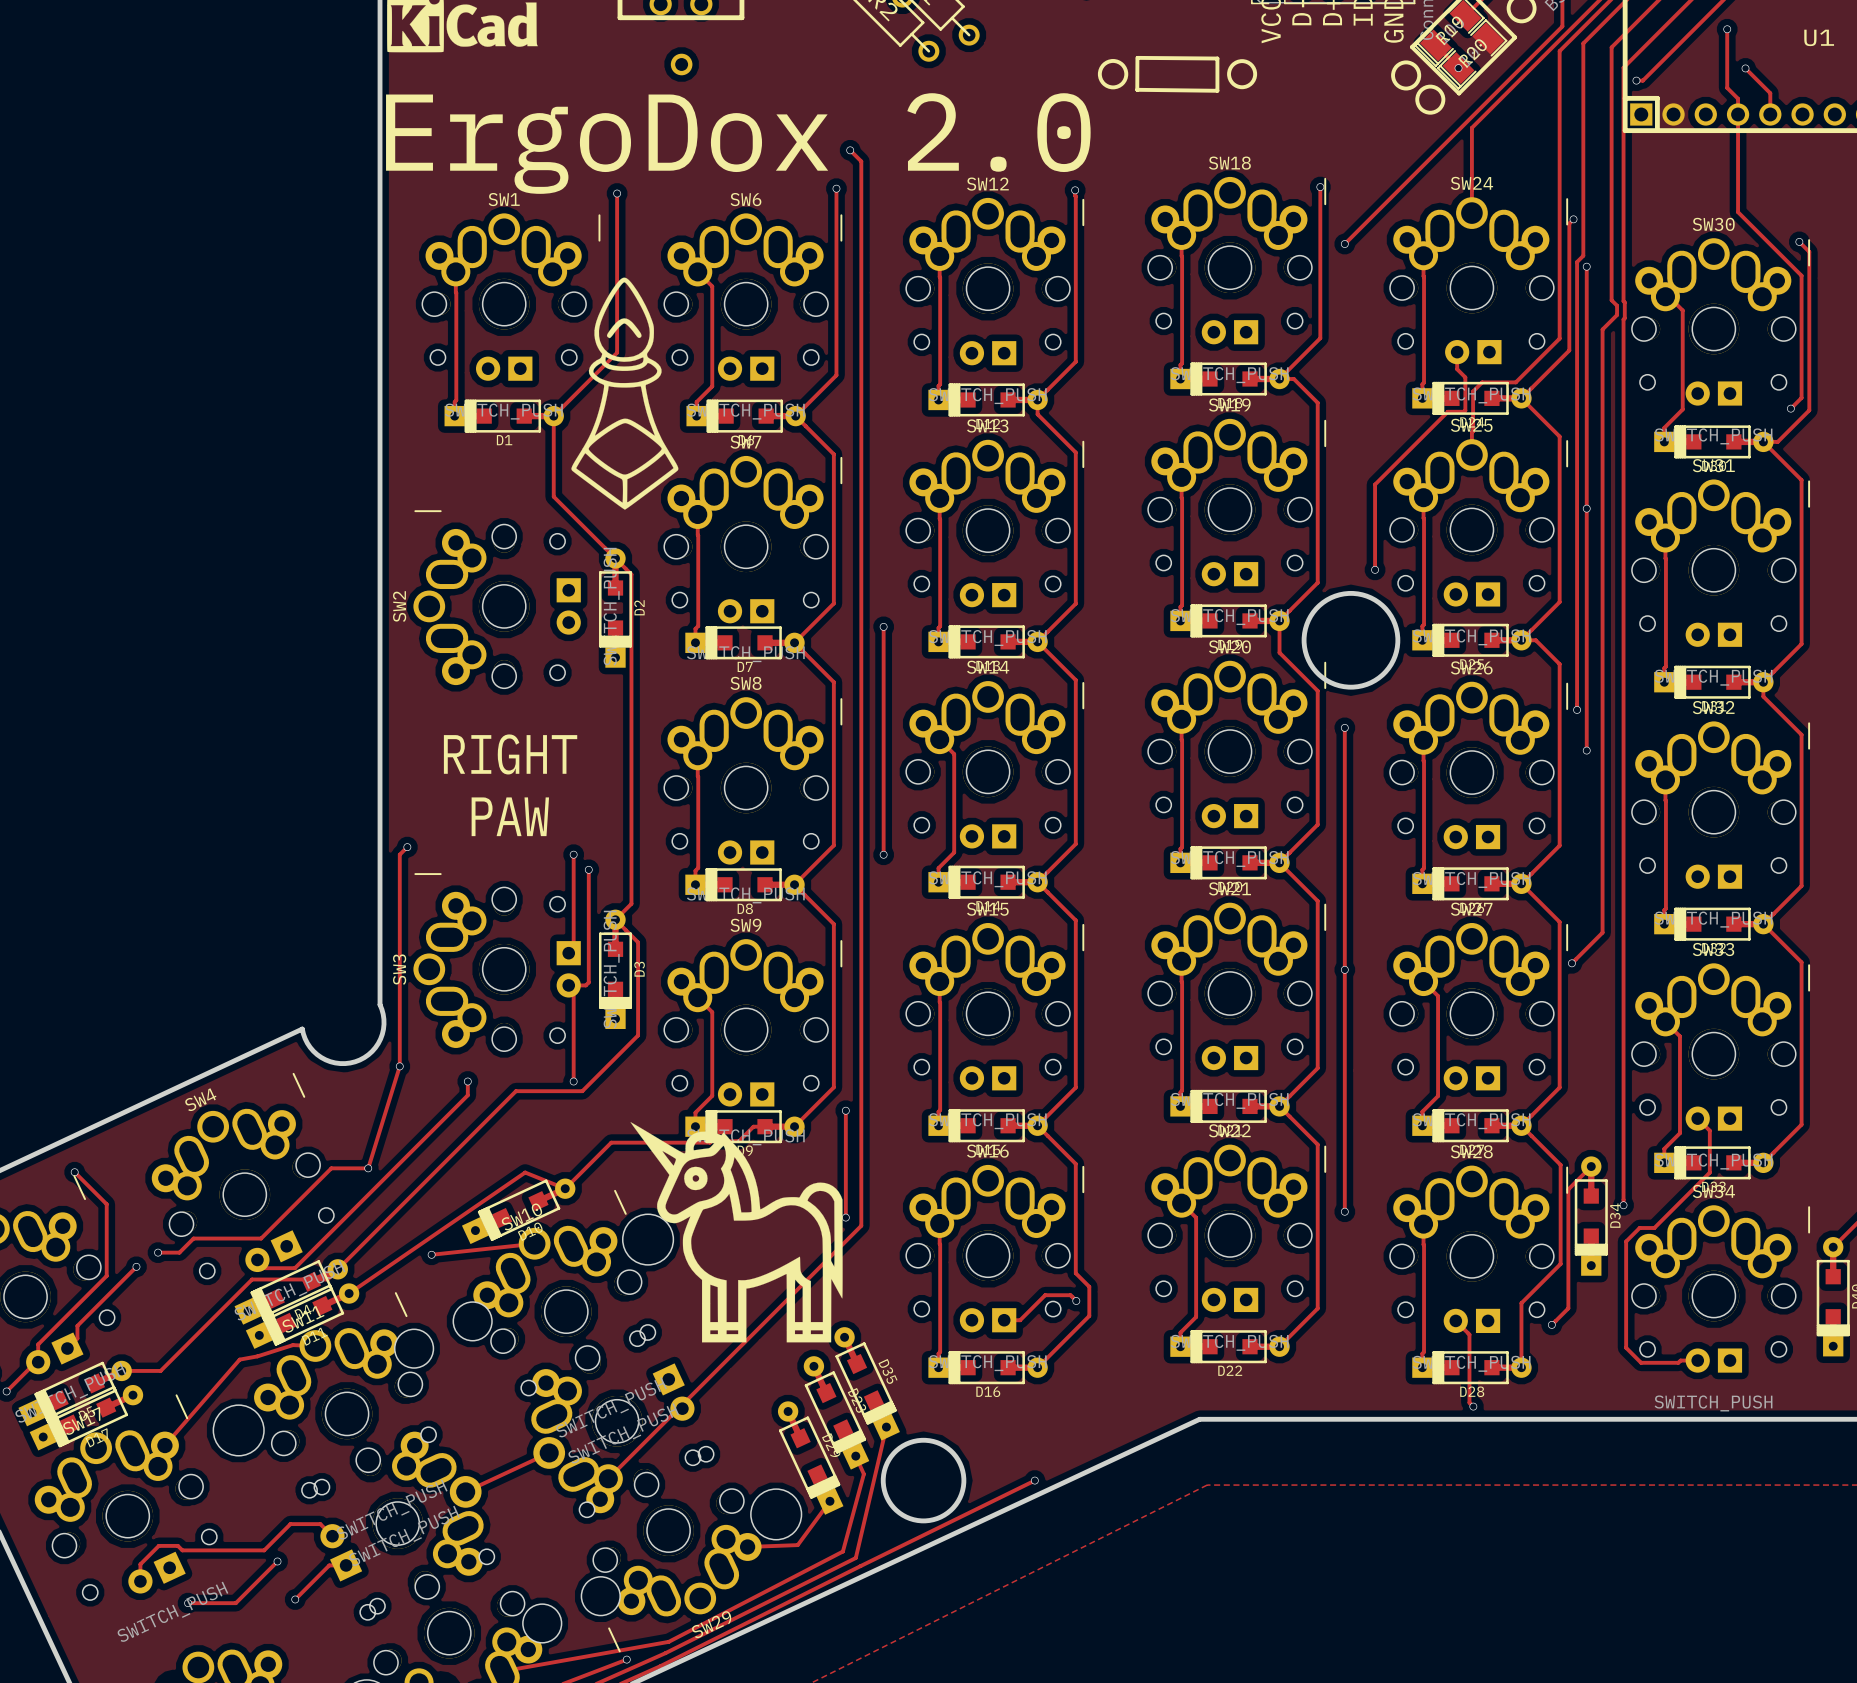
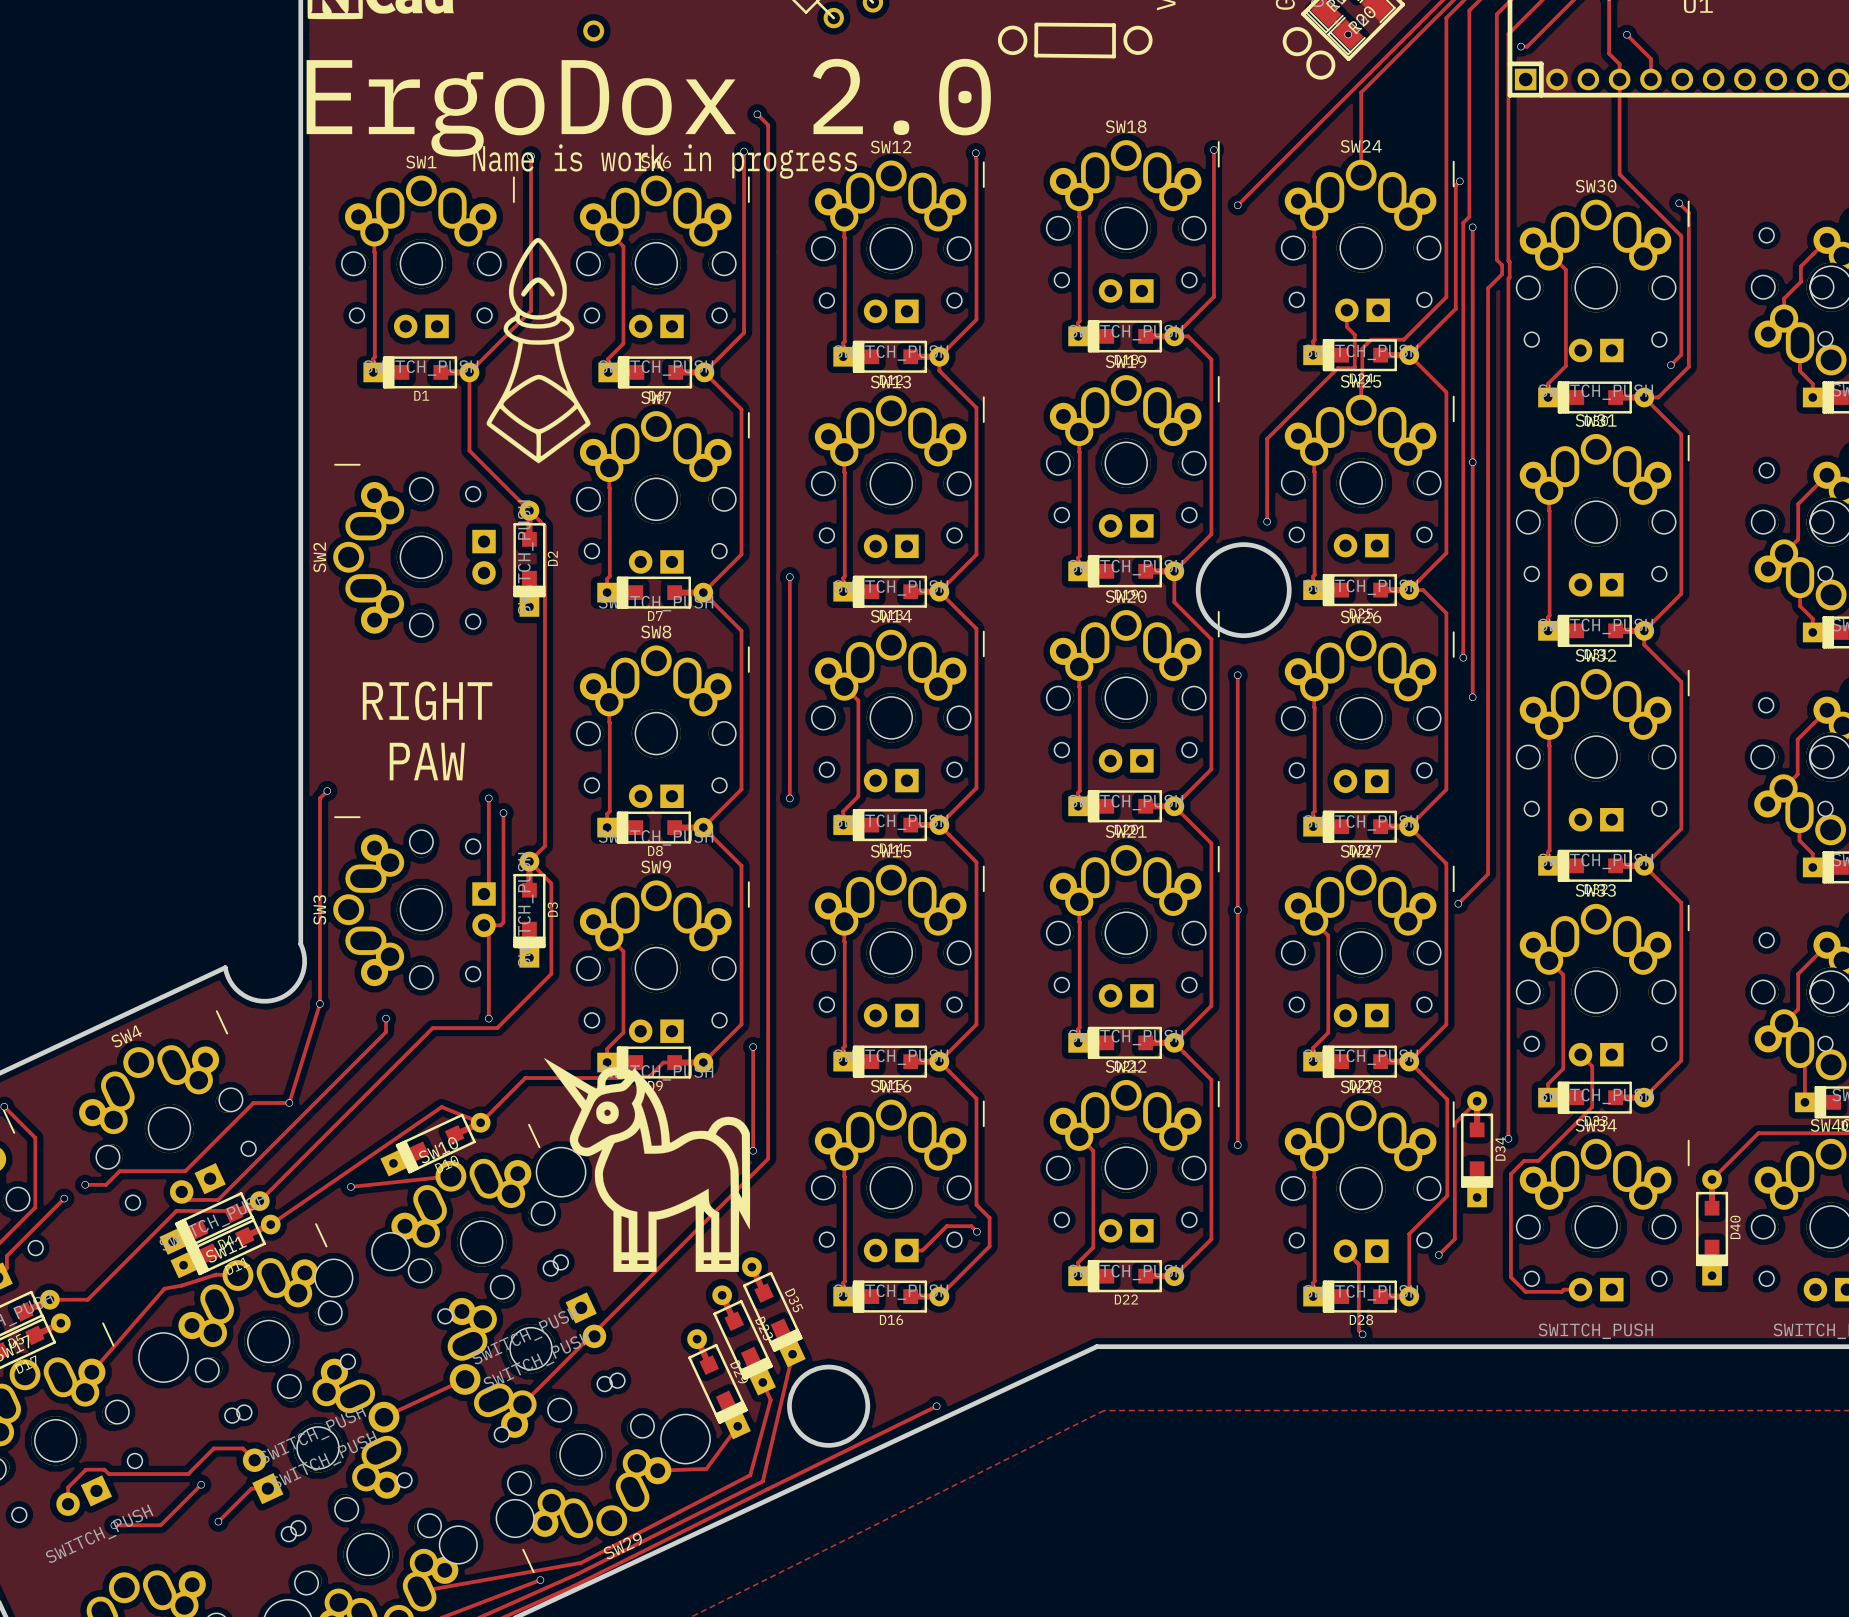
text: none -> Name is work in progress (665, 161)

